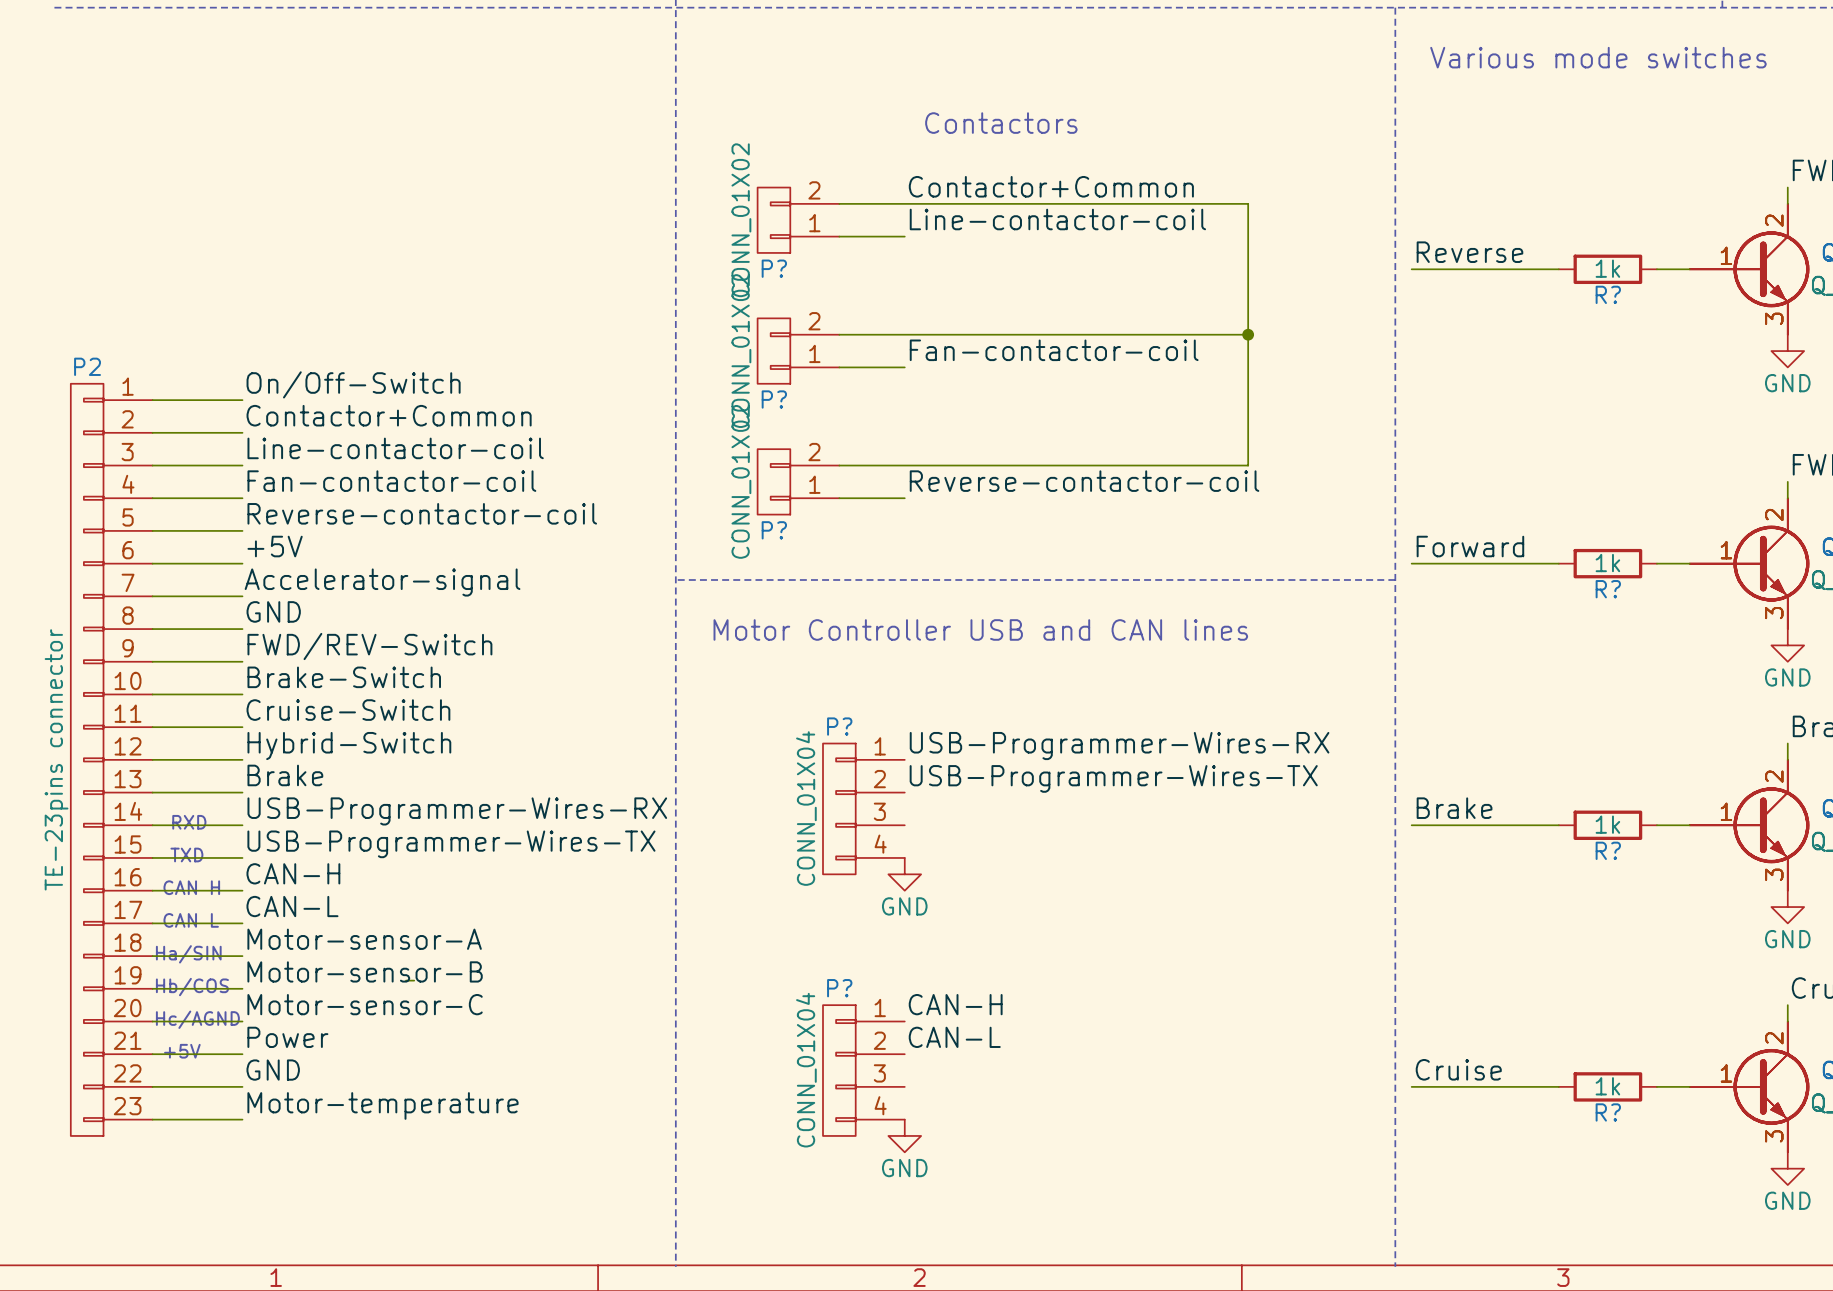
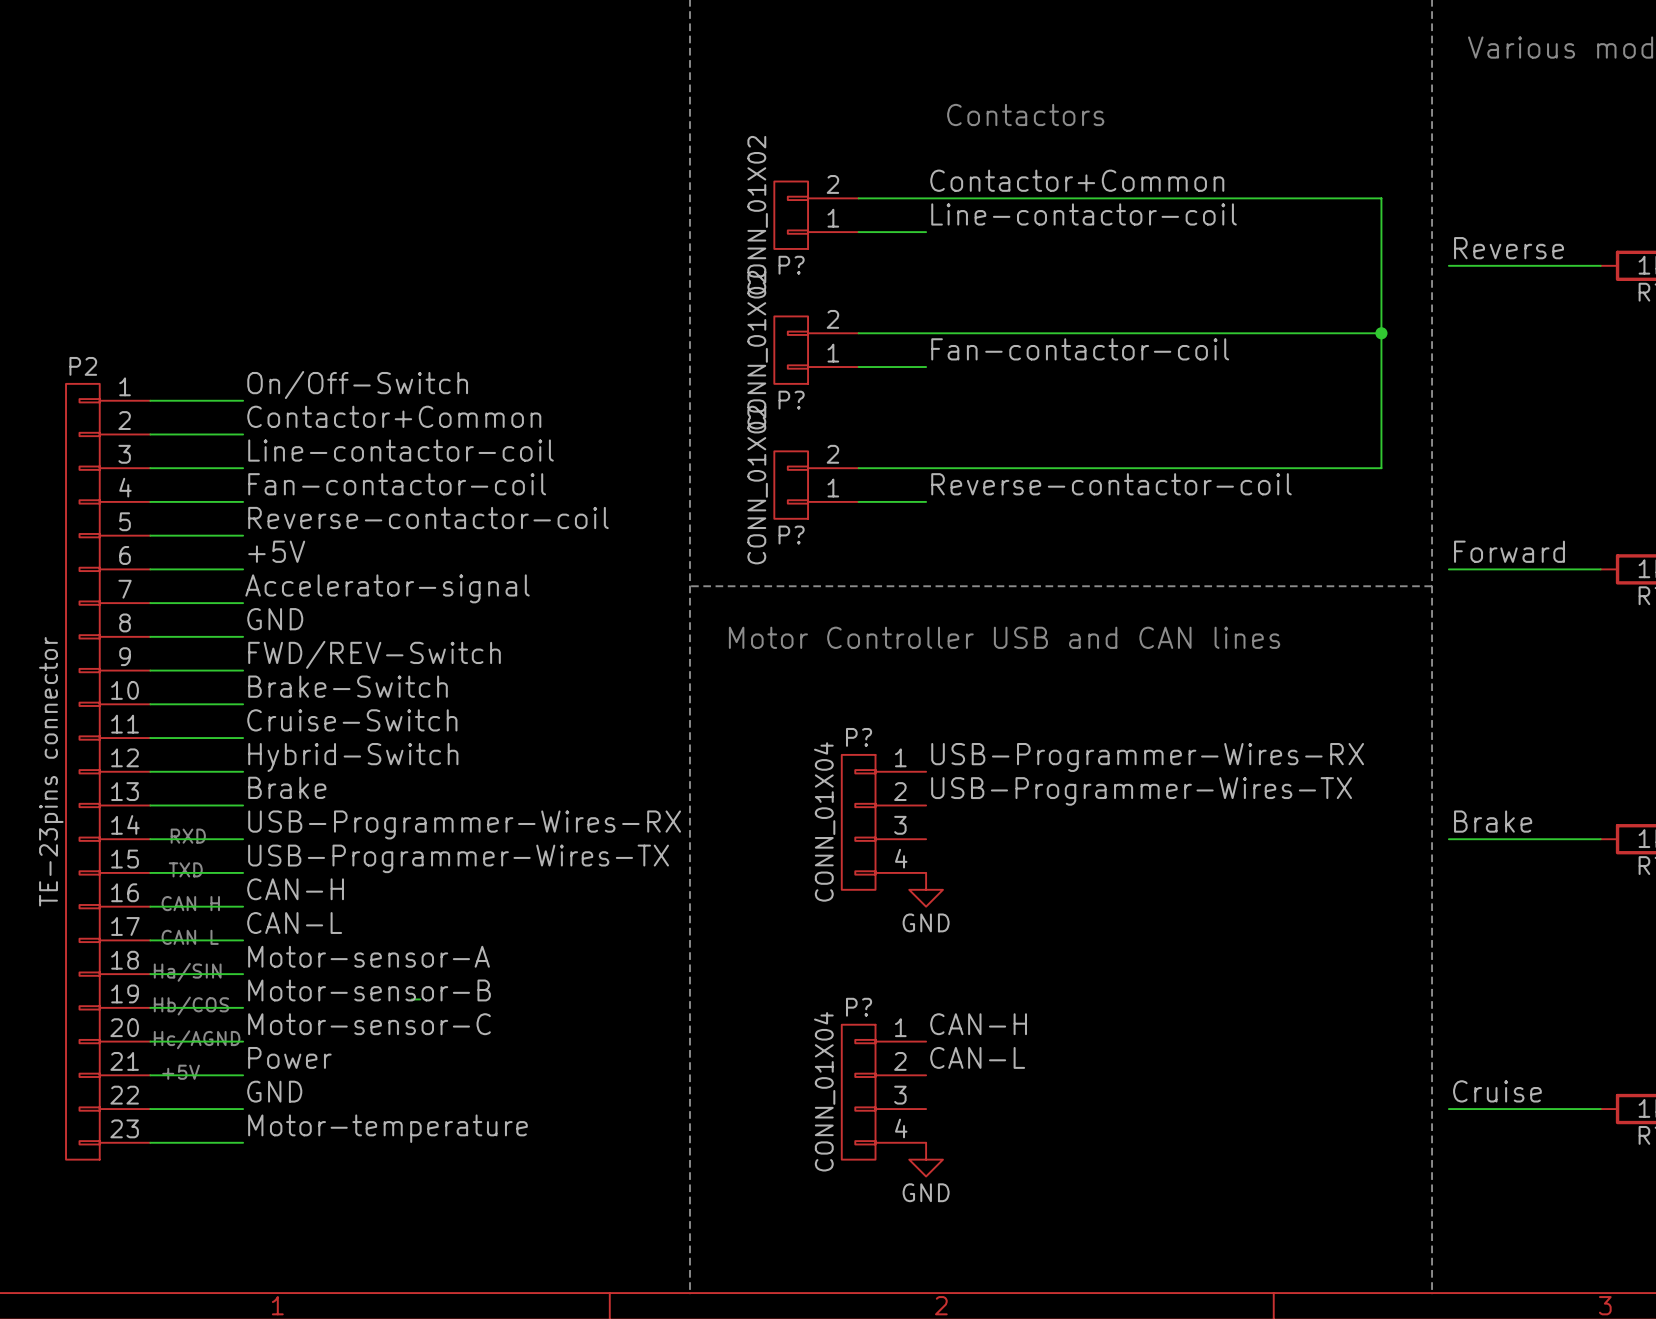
wire: (1248, 203) (1248, 465) -> (1280, 198) (1381, 198) (1381, 468) (1280, 468)
wire: none -> (1280, 333) (1381, 333)
junction: (1248, 334) -> none
junction: none -> (1381, 333)

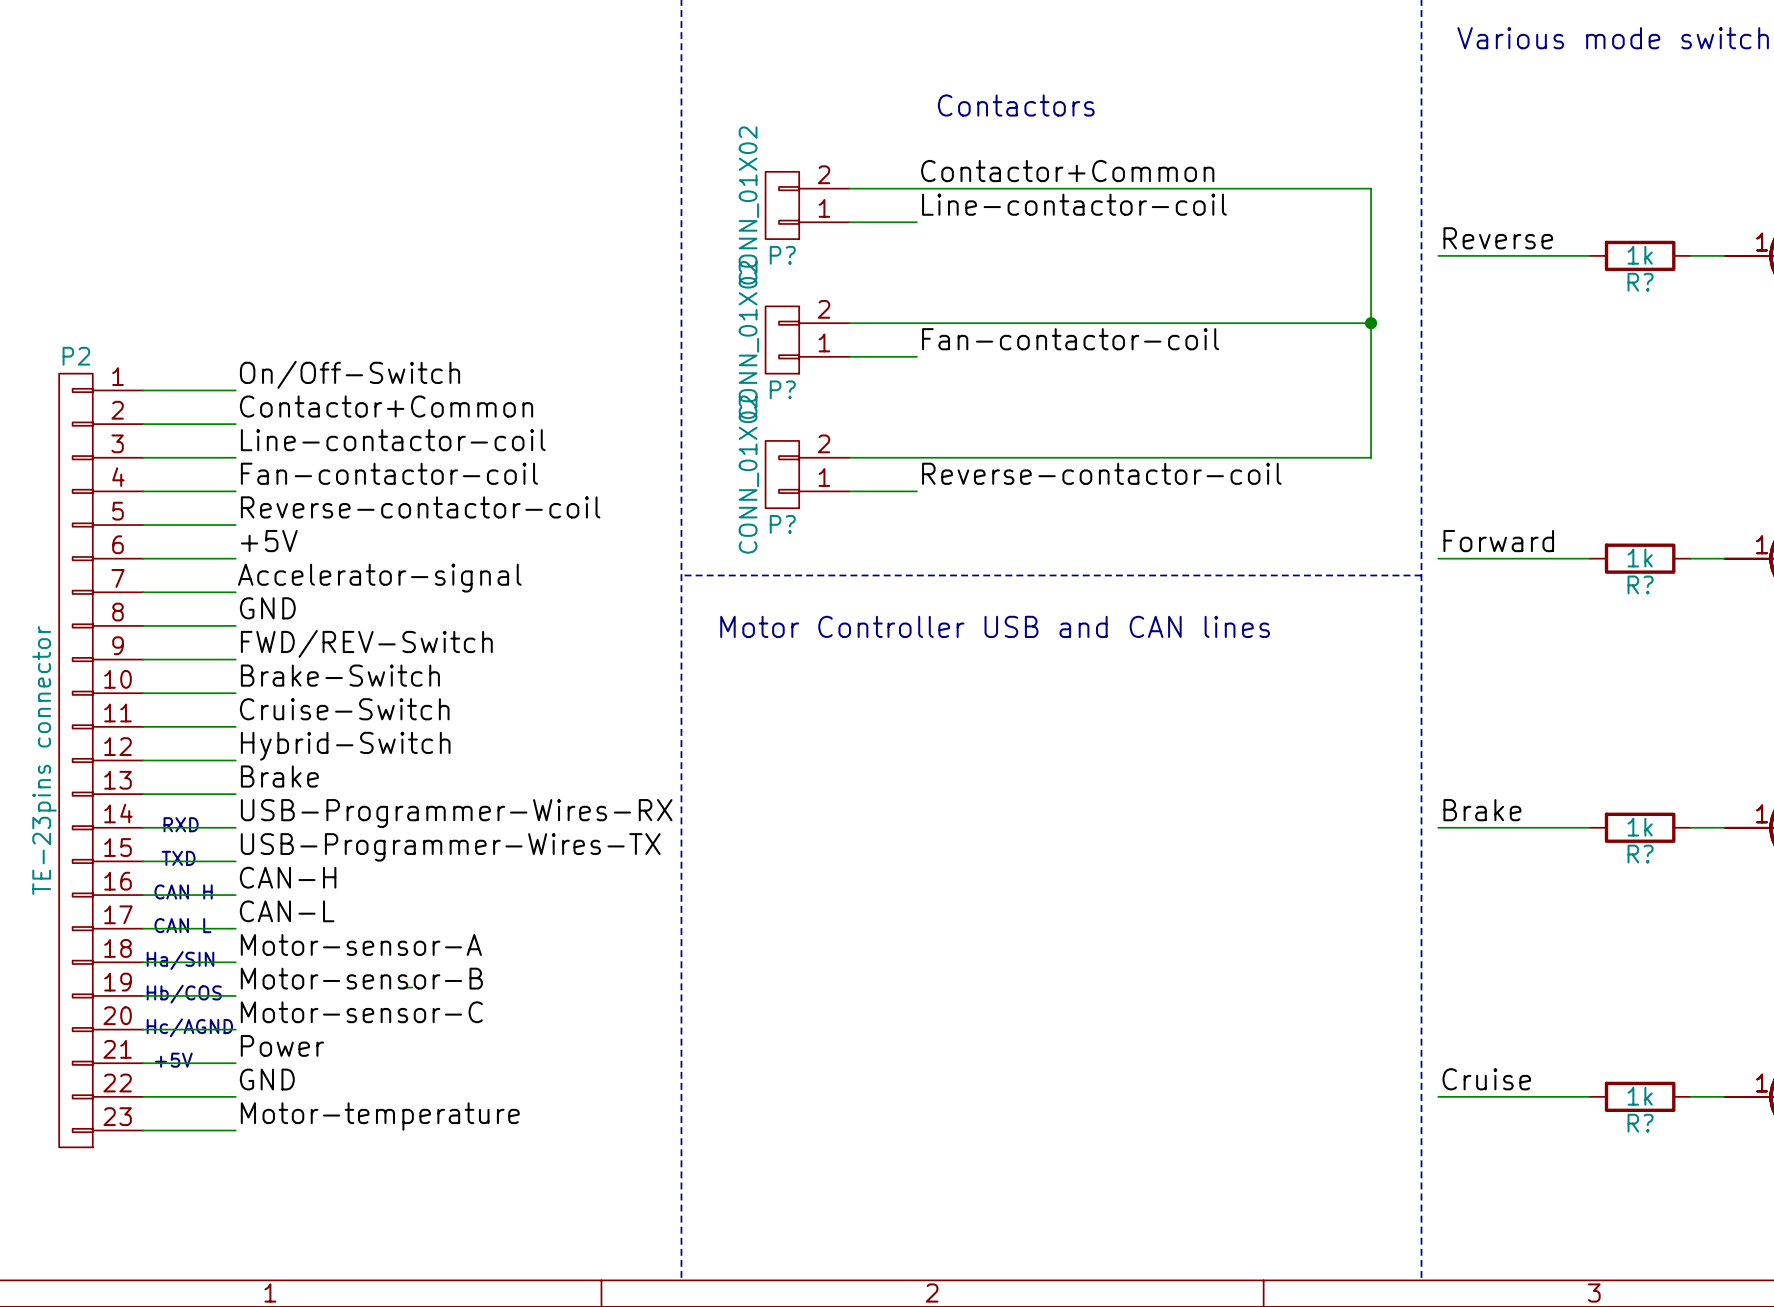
label: USB-Programmer-Wires-RX (1147, 757) -> none
label: USB-Programmer-Wires-TX (1141, 791) -> none
P?: CONN_01X04 (883, 822) -> none
power symbol: GND (926, 889) -> none
label: CAN-H (978, 1024) -> none
label: CAN-L (977, 1057) -> none
P?: CONN_01X04 (883, 1092) -> none
power symbol: GND (926, 1159) -> none

